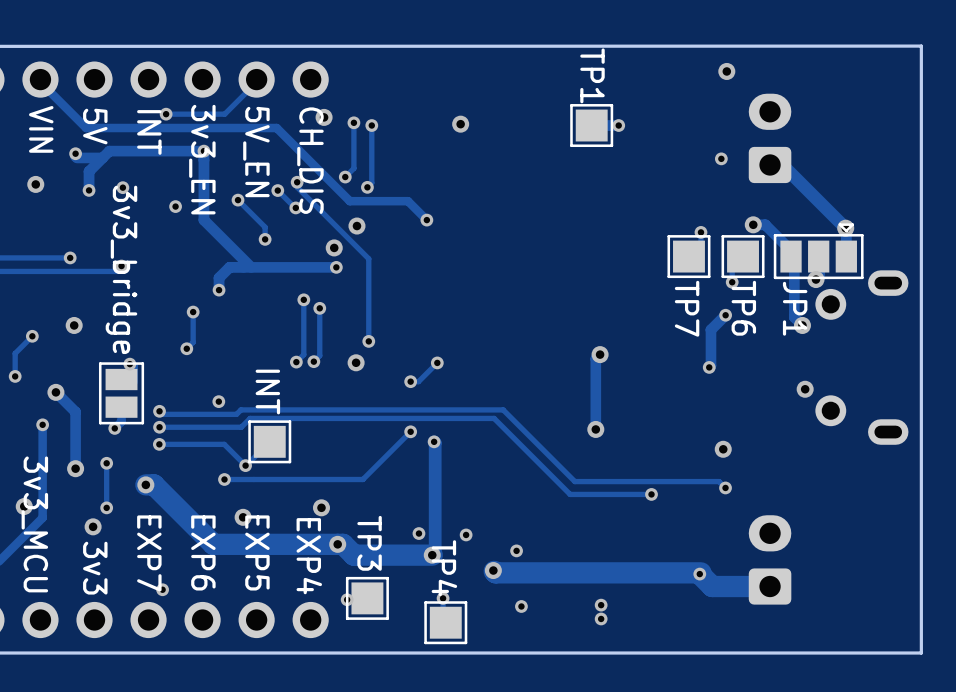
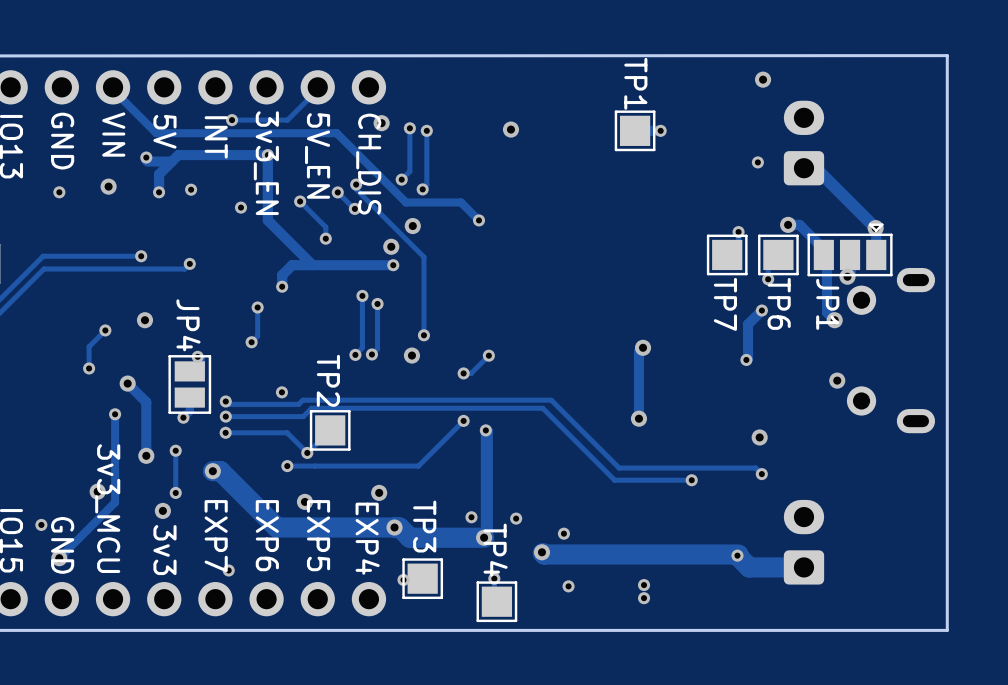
3v3_bridge name: 3v3_bridge (121, 269) -> JP4 (188, 325)
INT name: INT (267, 392) -> TP2 (328, 380)

